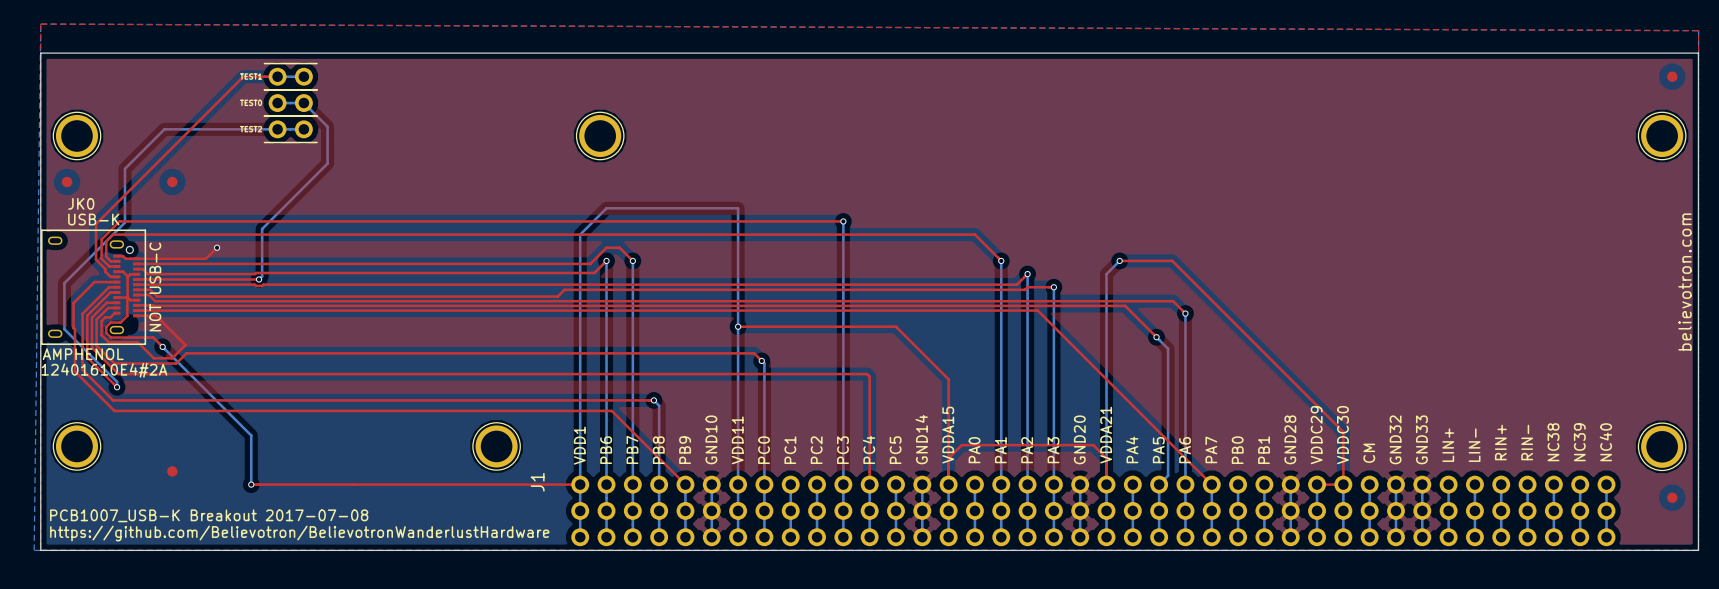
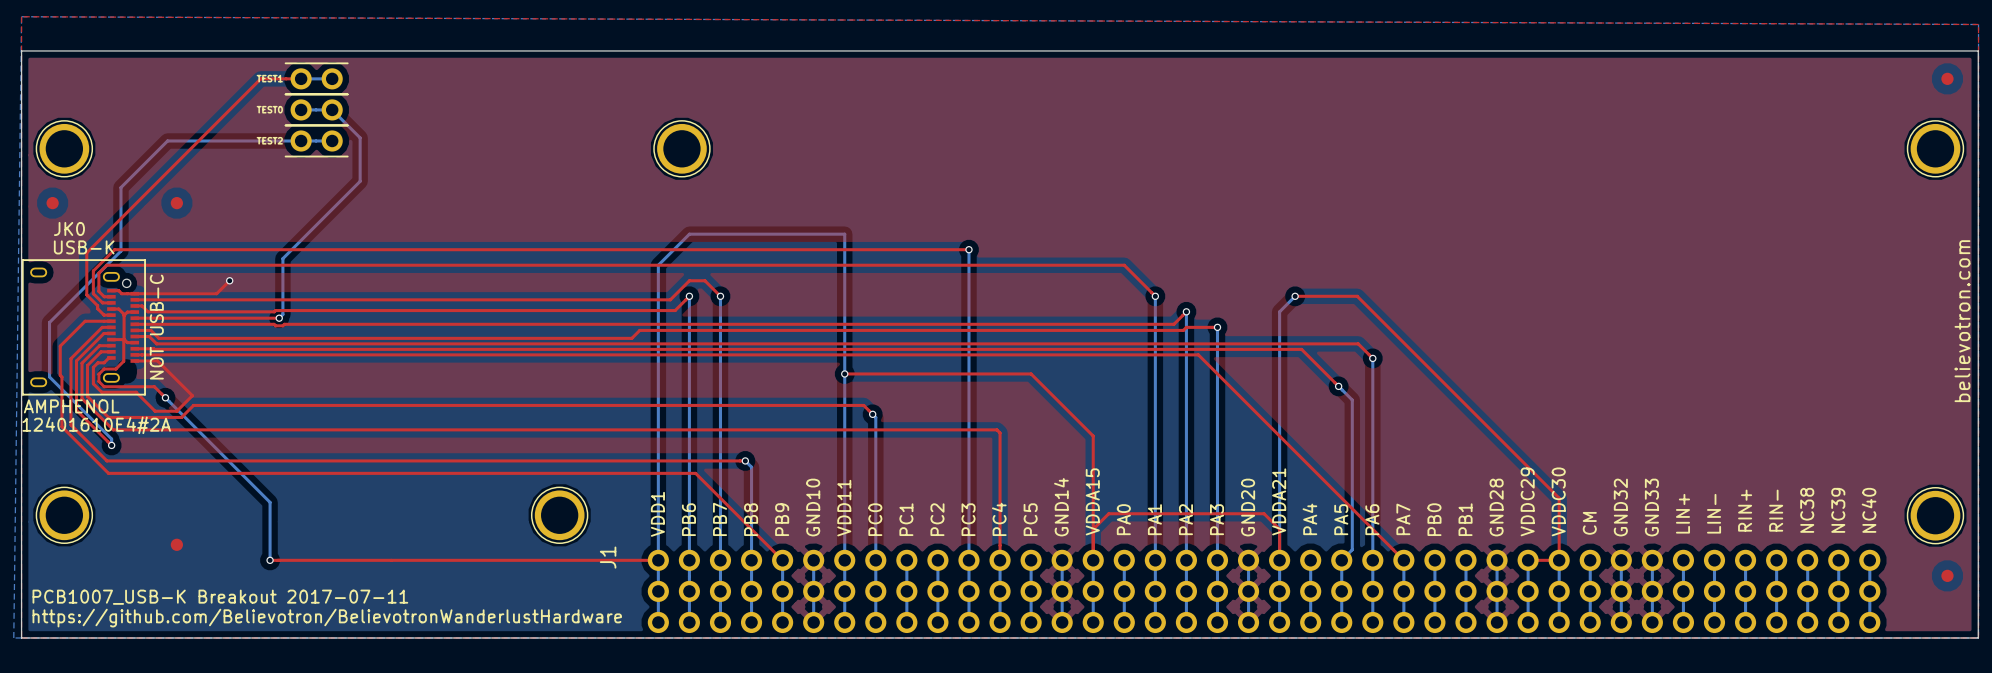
text: PCB1007_USB-K Breakout 2017-07-08 (209, 515) -> PCB1007_USB-K Breakout 2017-07-11 (220, 597)

